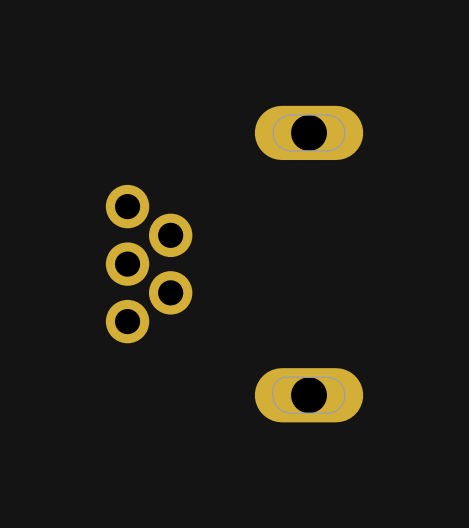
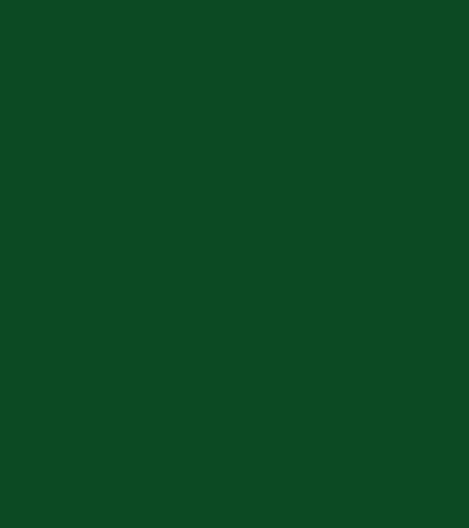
part: (234, 264) -> none

